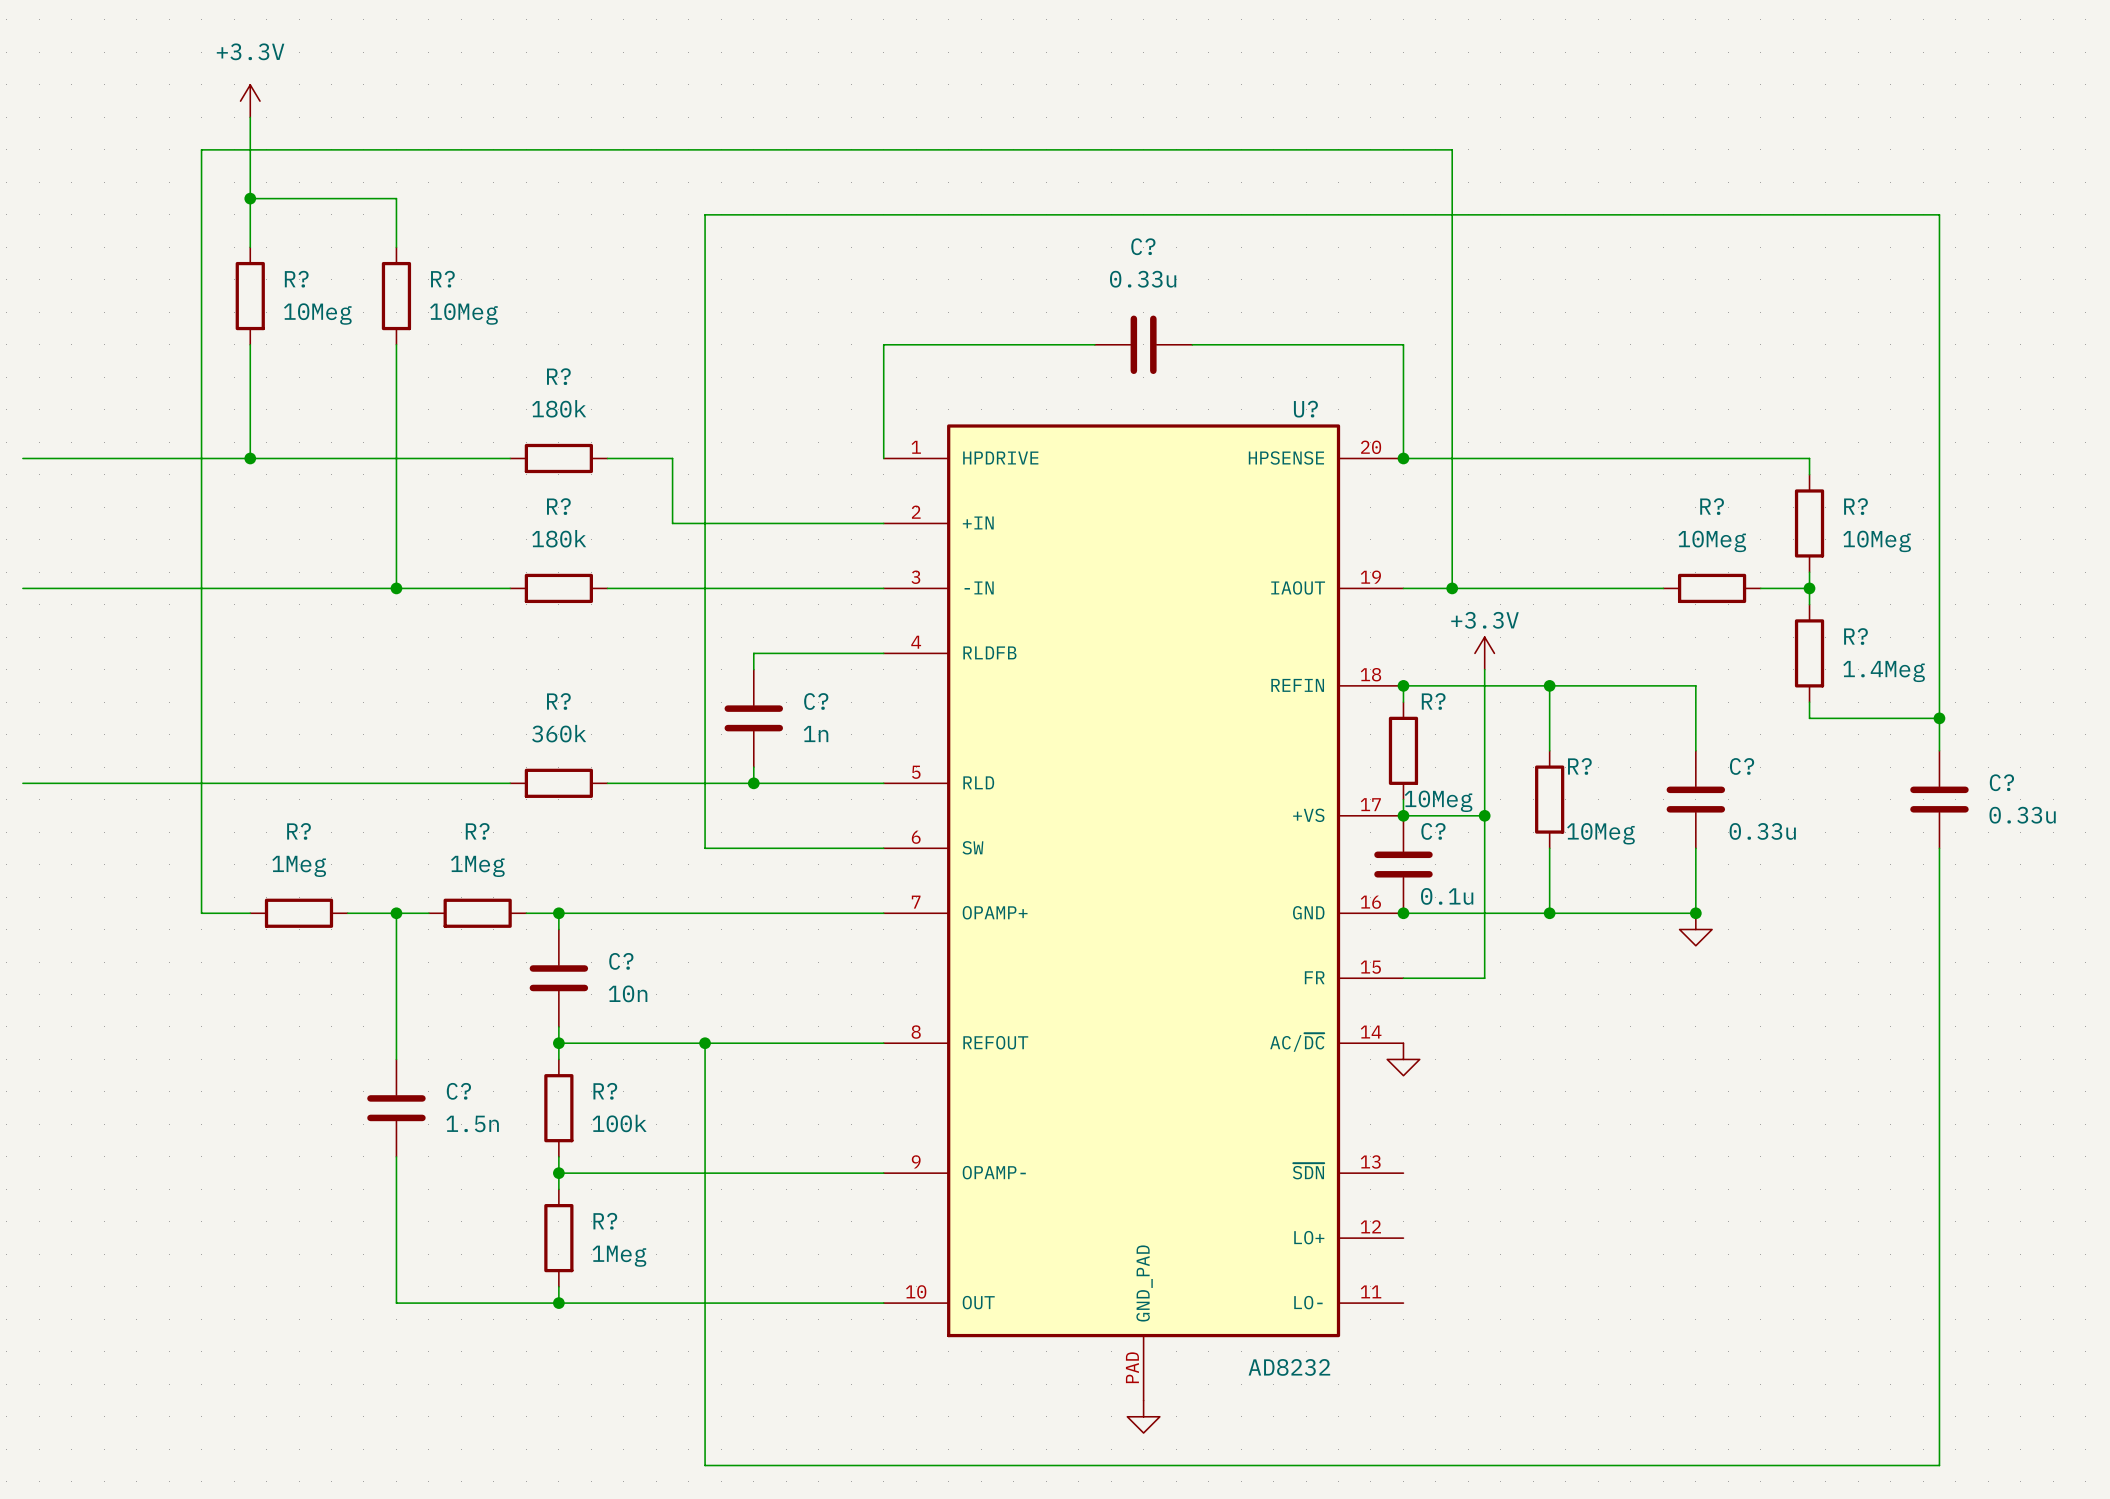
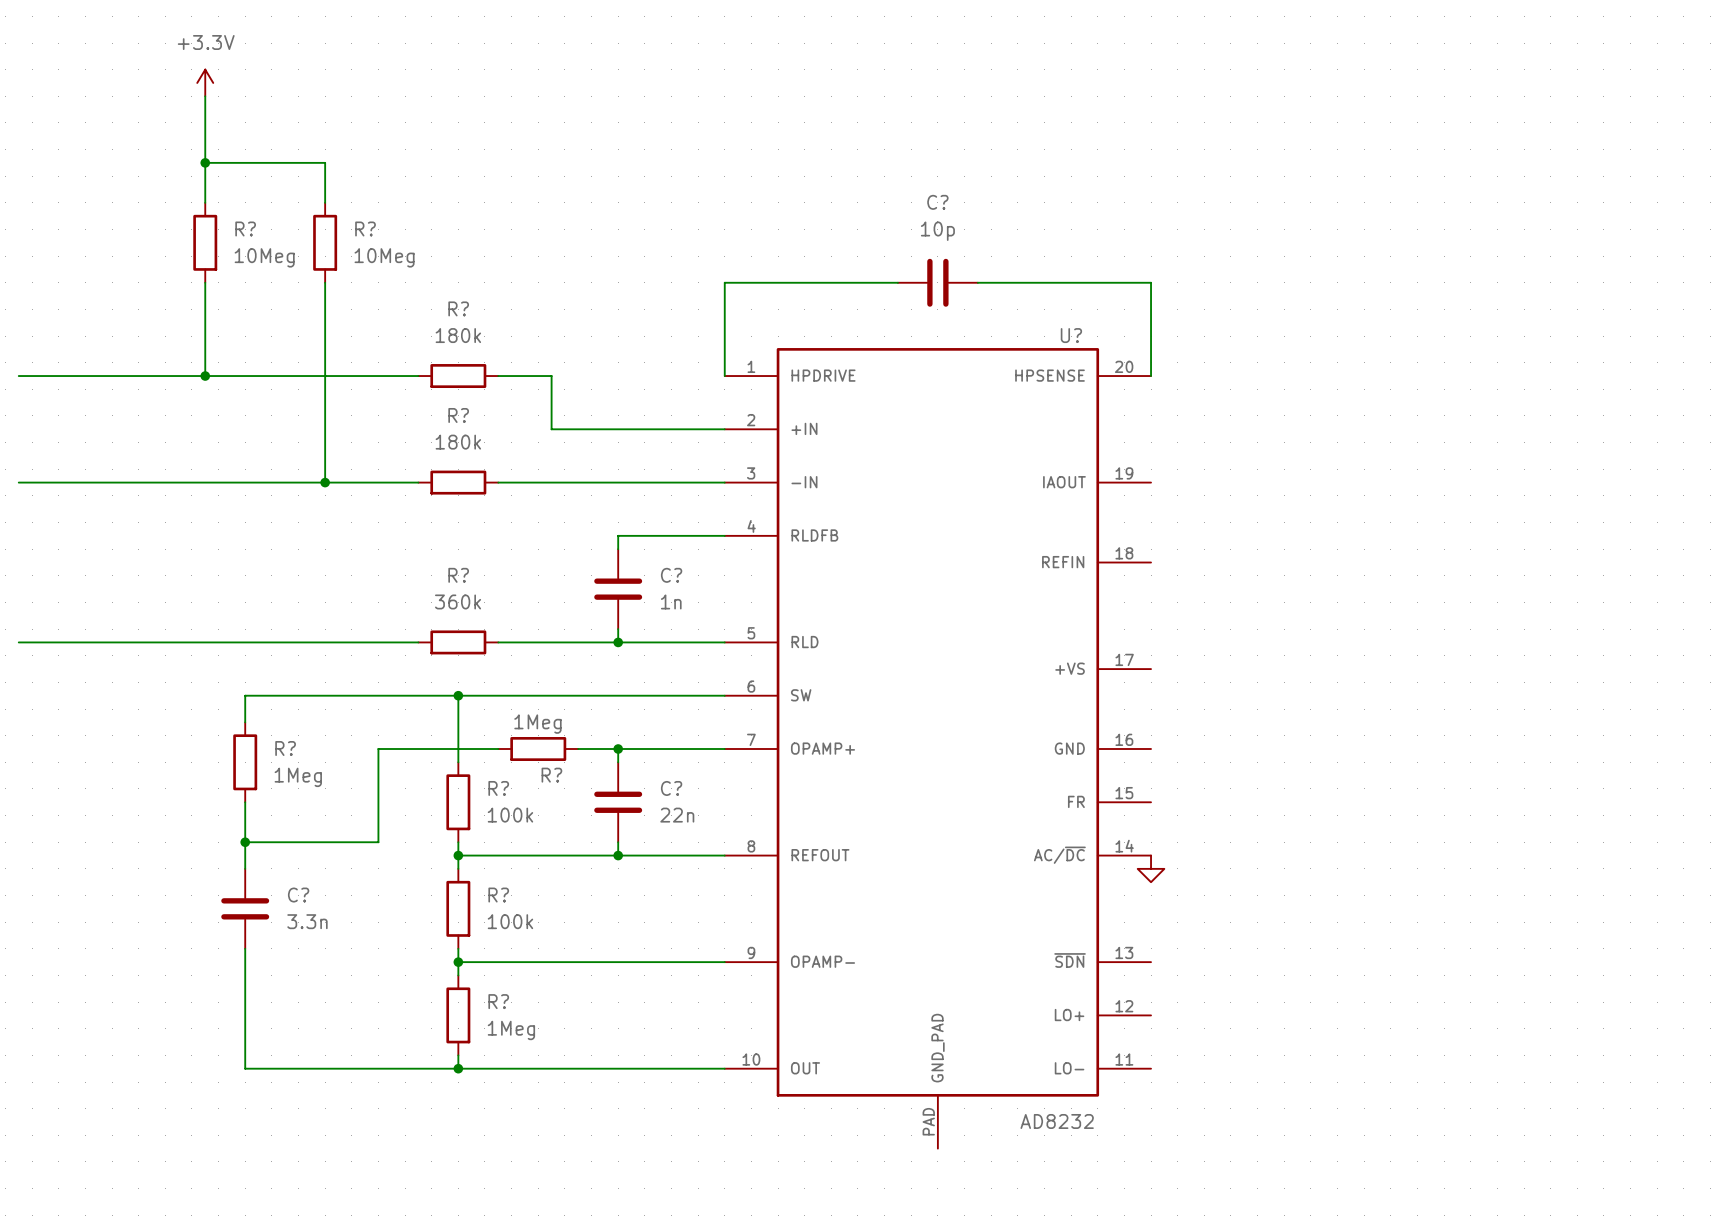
C? value: 0.33u (1143, 279) -> 10p (937, 231)
wire: (1403, 458) (1809, 458) (1809, 474) -> none
junction: (1403, 458) -> none
R?: 10Meg (1809, 523) -> none
wire: (1809, 572) (1809, 604) -> none
wire: (1403, 588) (1663, 588) -> none
wire: (1452, 588) (1452, 149) (201, 149) (201, 913) (250, 913) -> none
junction: (1452, 588) -> none
R?: 10Meg (1712, 588) -> none
wire: (1760, 588) (1809, 588) -> none
junction: (1809, 588) -> none
power symbol: +3.3V (1484, 653) -> none
R?: 1.4Meg (1809, 653) -> none
wire: (1484, 669) (1484, 978) (1403, 978) -> none
junction: (1403, 685) -> none
wire: (1549, 685) (1549, 750) -> none
junction: (1549, 685) -> none
wire: (1403, 702) (1403, 685) (1695, 685) (1695, 750) -> none
wire: (1809, 702) (1809, 718) (1939, 718) -> none
junction: (1939, 718) -> none
R?: 10Meg (1403, 750) -> none
wire: (1939, 750) (1939, 214) (705, 214) (705, 848) -> (245, 722) (245, 695) (578, 695)
wire: (1403, 799) (1403, 815) (1484, 815) -> none
R?: 10Meg (1549, 799) -> none
C?: 0.33u (1695, 799) -> none
C?: 0.33u (1939, 799) -> none
junction: (1403, 815) -> none
junction: (1484, 815) -> none
R? name position: R? (299, 831) -> R? (285, 748)
wire: none -> (458, 695) (458, 749)
wire: (1549, 848) (1549, 913) -> none
wire: (1695, 848) (1695, 913) (1403, 913) -> none
wire: (1939, 848) (1939, 1465) (705, 1465) (705, 1043) -> none
C?: 0.1u (1403, 864) -> none
R? value position: 1Meg (299, 866) -> 1Meg (298, 777)
R? rotation: 0° (299, 913) -> 90° clockwise (245, 762)
wire: (347, 913) (428, 913) -> none
wire: (396, 913) (396, 1059) -> none
junction: (396, 913) -> none
R?: 1Meg (477, 913) -> none
wire: none -> (431, 749) (378, 749) (378, 842) (245, 842)
junction position: (558, 913) -> (458, 695)
wire: (607, 913) (705, 913) -> none
R?: none -> 1Meg (538, 749)
wire: none -> (618, 749) (618, 762)
junction: none -> (618, 749)
junction: (1403, 913) -> none
junction: (1549, 913) -> none
junction: (1695, 913) -> none
power symbol: (1695, 929) -> none
wire: none -> (245, 802) (245, 868)
C?: 10n (558, 978) -> none
R?: none -> 100k (458, 802)
C?: none -> 22n (618, 802)
junction: none -> (245, 842)
wire: none -> (618, 842) (618, 855)
junction position: (705, 1043) -> (618, 855)
C?: none -> 3.3n (245, 908)
C?: 1.5n (396, 1108) -> none
wire: (396, 1156) (396, 1303) -> (245, 948) (245, 1068) (325, 1068)
power symbol: (1143, 1416) -> none

